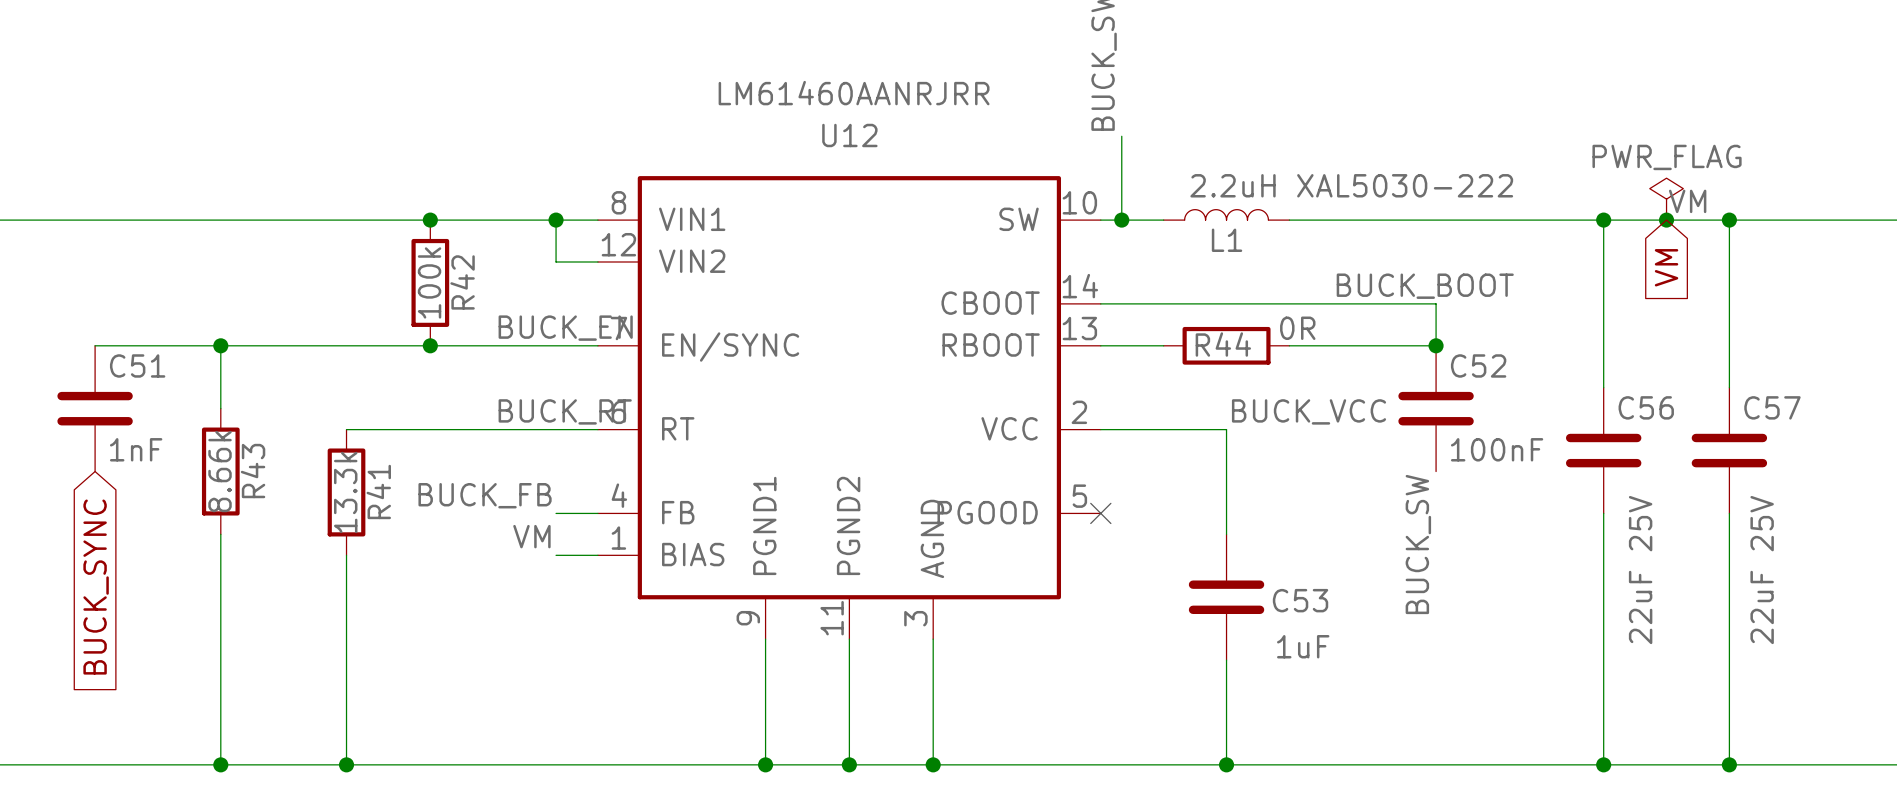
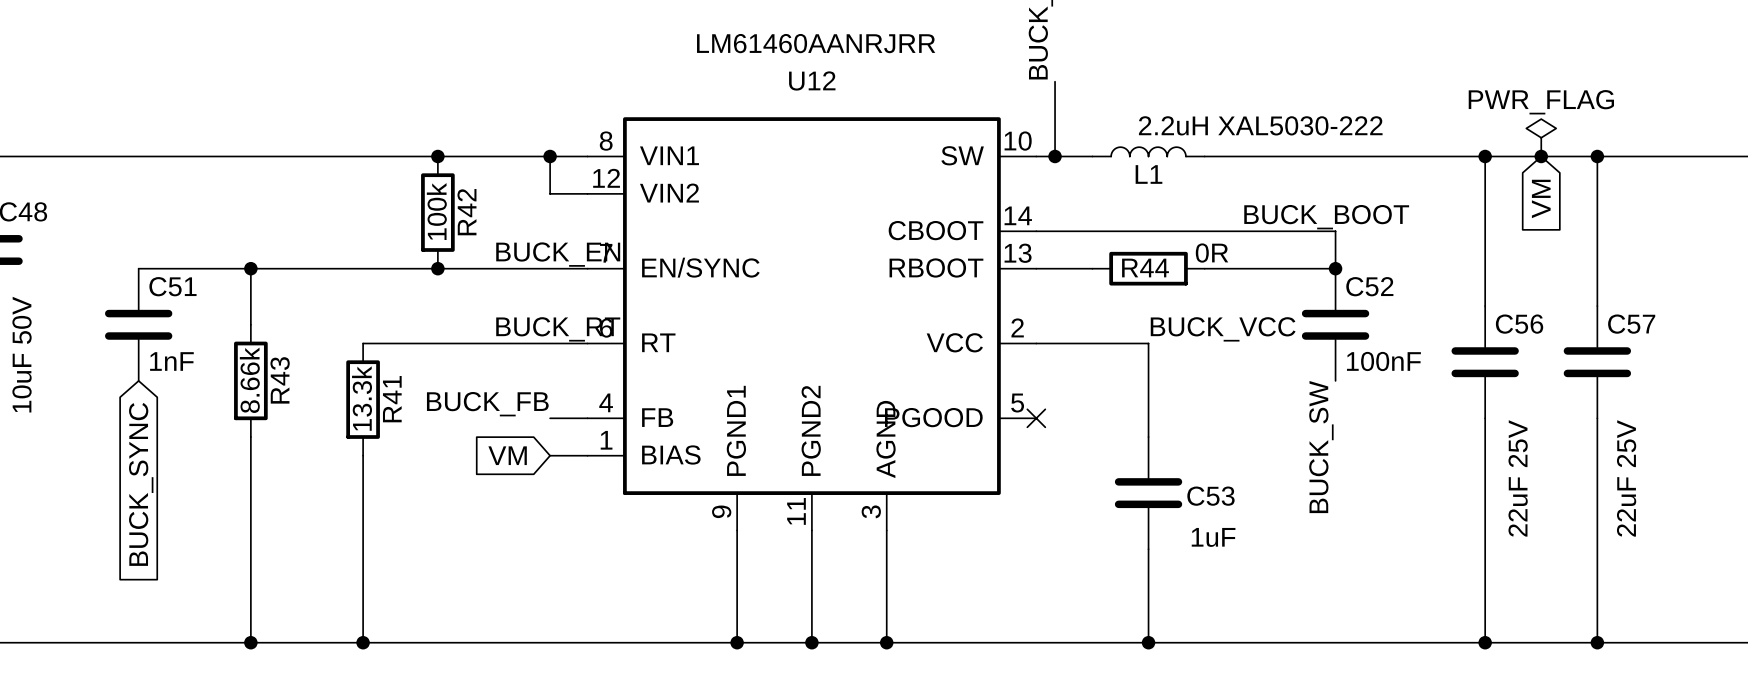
label: VM (1687, 201) -> none
label: VM (531, 536) -> none
global label: none -> VM (507, 455)

